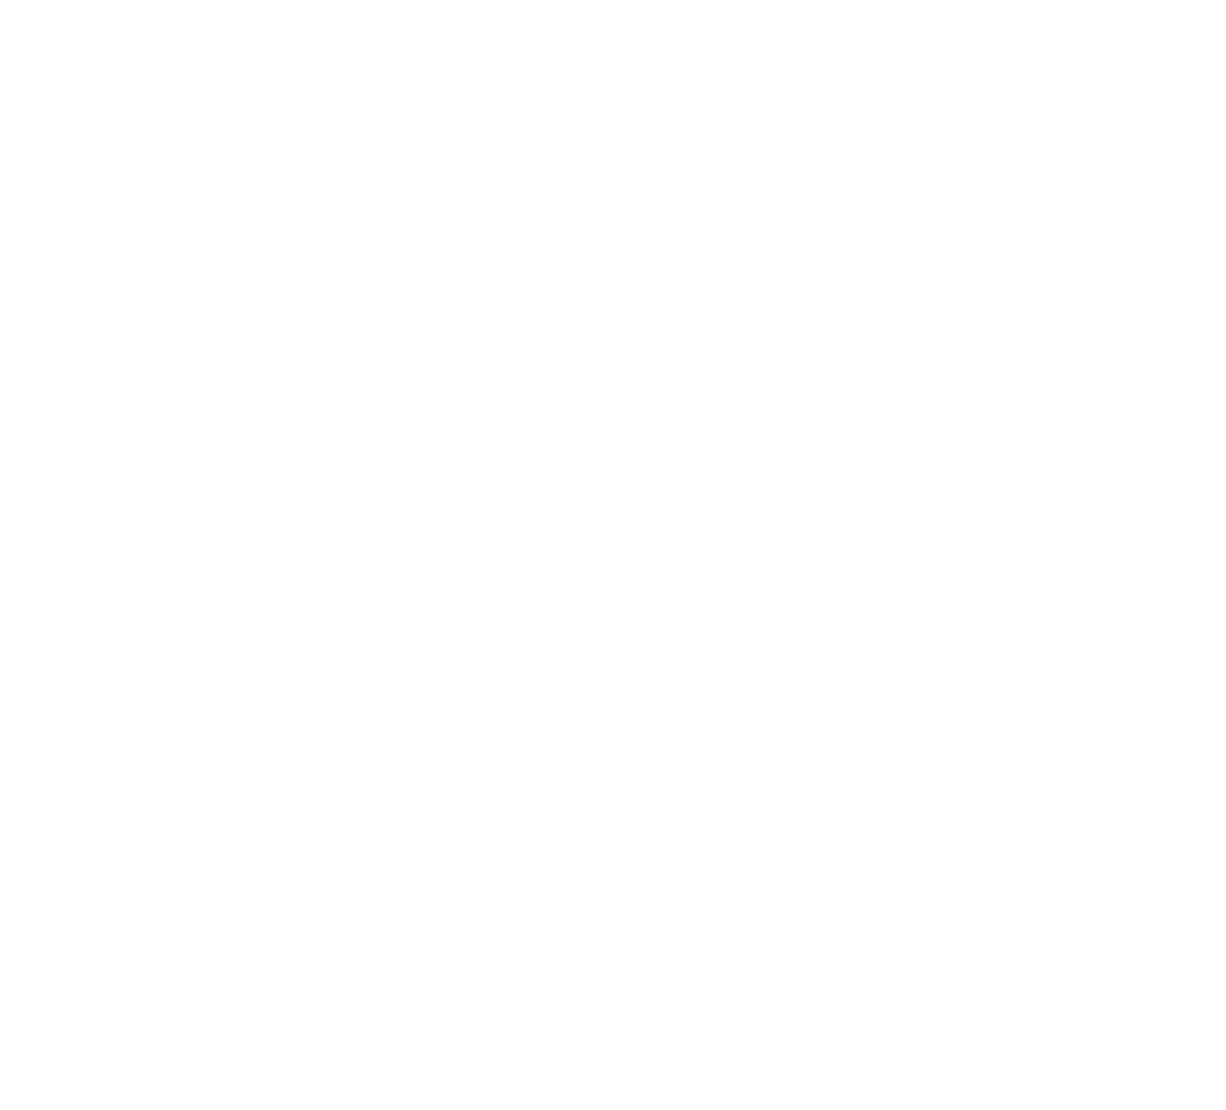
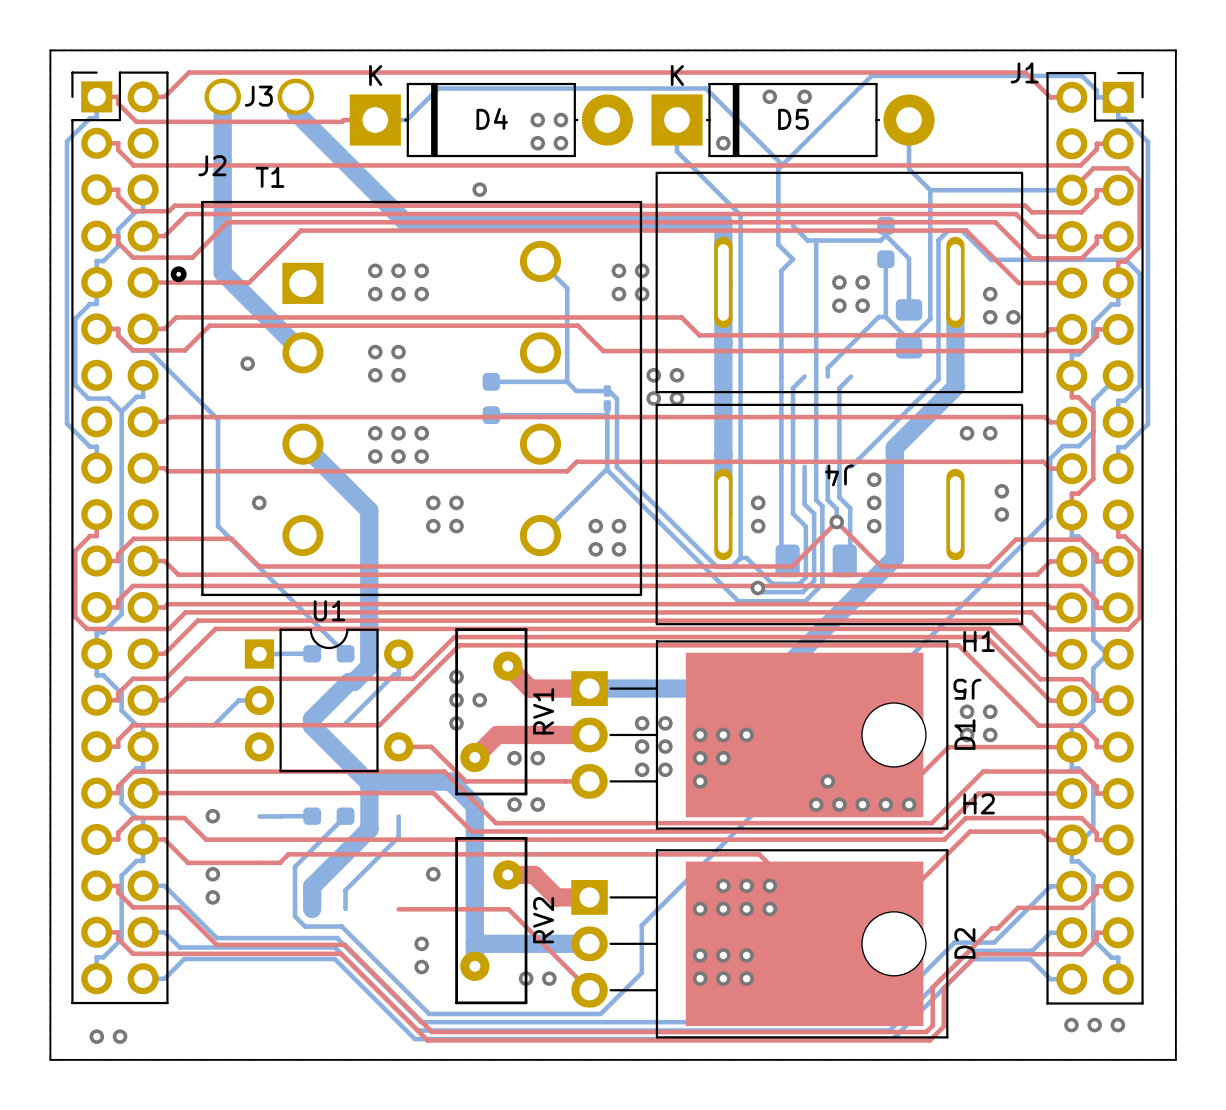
board edge: none -> (50, 50) (50, 1059) (1175, 1059) (1175, 50) (50, 50)
bottom track: none -> (96, 96) (96, 118) (90, 118) (67, 141) (67, 423) (90, 446) (96, 446) (96, 468)
top track: none -> (96, 96) (118, 96) (118, 103) (136, 121) (341, 121) (343, 120) (375, 120)
top track: none -> (143, 96) (164, 96) (188, 72) (1025, 72) (1050, 97) (1071, 97)
bottom track: none -> (222, 96) (222, 272) (302, 352)
J3: none -> (259, 96)
bottom track: none -> (295, 96) (295, 112) (405, 222) (723, 222) (723, 514)
via: none -> (769, 96)
via: none -> (804, 96)
bottom track: none -> (375, 120) (406, 120) (438, 88) (705, 88) (782, 164)
D4: none -> (491, 120)
via: none -> (537, 120)
via: none -> (560, 120)
bottom track: none -> (676, 120) (676, 151) (740, 215) (740, 558)
D5: none -> (792, 120)
bottom track: none -> (909, 120) (909, 168) (930, 190)
top track: none -> (96, 143) (118, 143) (118, 150) (133, 165) (1080, 165) (1096, 149) (1096, 143) (1118, 143)
via: none -> (537, 143)
via: none -> (560, 143)
via: none -> (723, 143)
top track: none -> (96, 189) (118, 189) (118, 196) (132, 211) (169, 211) (174, 205) (1025, 205) (1031, 212) (1081, 212) (1096, 196) (1096, 190) (1118, 190)
bottom track: none -> (143, 189) (143, 211) (136, 211) (118, 229) (118, 246) (103, 261) (96, 261) (96, 304) (90, 304) (75, 318) (75, 385) (88, 398) (108, 398) (121, 411)
via: none -> (479, 189)
bottom track: none -> (930, 190) (930, 318) (909, 340)
bottom track: none -> (930, 190) (1071, 190)
top track: none -> (1071, 190) (1093, 168) (1127, 168) (1139, 180) (1139, 246) (1124, 261) (1118, 261) (1118, 283)
bottom track: none -> (792, 225) (807, 240) (880, 240) (885, 235)
bottom track: none -> (885, 235) (909, 258) (909, 309)
top track: none -> (96, 236) (118, 236) (118, 242) (132, 257) (192, 257) (227, 222) (995, 222) (1031, 258) (1081, 258) (1096, 243) (1096, 236) (1118, 236)
top track: none -> (143, 236) (164, 236) (186, 214) (1016, 214) (1038, 236) (1071, 236)
bottom track: none -> (816, 240) (816, 500) (822, 506) (822, 584) (805, 601) (738, 601) (607, 470)
part: none -> (885, 242)
bottom track: none -> (885, 259) (885, 317)
bottom track: none -> (540, 261) (567, 288) (567, 381)
via: none -> (375, 270)
via: none -> (398, 270)
via: none -> (421, 270)
via: none -> (618, 270)
via: none -> (642, 270)
top track: none -> (143, 282) (249, 282) (301, 230) (966, 230) (1018, 283) (1071, 283)
J4: none -> (839, 282)
via: none -> (839, 282)
via: none -> (862, 282)
bottom track: none -> (955, 282) (955, 387) (894, 447) (894, 558) (764, 688) (589, 688)
bottom track: none -> (1118, 283) (1118, 304) (1111, 304) (1093, 322) (1093, 339) (1078, 354) (1071, 354) (1071, 375)
via: none -> (375, 294)
via: none -> (398, 294)
via: none -> (421, 294)
via: none -> (618, 294)
via: none -> (642, 294)
via: none -> (990, 294)
via: none -> (839, 305)
via: none -> (862, 305)
bottom track: none -> (885, 317) (878, 317) (827, 367) (827, 376)
bottom track: none -> (885, 317) (909, 340)
via: none -> (990, 317)
via: none -> (1013, 317)
bottom track: none -> (96, 328) (118, 328) (118, 335) (132, 350) (148, 350) (218, 419) (218, 526) (345, 653)
top track: none -> (96, 328) (118, 328) (118, 335) (132, 350) (184, 350) (209, 325) (577, 325) (603, 351) (1081, 351) (1096, 336) (1096, 329) (1118, 329)
top track: none -> (143, 328) (164, 328) (176, 317) (681, 317) (699, 335) (1044, 335) (1050, 329) (1071, 329)
part: none -> (909, 328)
via: none -> (375, 352)
via: none -> (398, 352)
via: none -> (247, 363)
bottom track: none -> (143, 375) (143, 396) (136, 396) (121, 411)
via: none -> (375, 375)
via: none -> (398, 375)
via: none -> (653, 375)
via: none -> (676, 375)
top track: none -> (1071, 375) (1071, 397) (1078, 397) (1093, 412) (1093, 478) (1078, 493) (1071, 493) (1071, 515)
bottom track: none -> (1118, 375) (1093, 400) (1093, 431) (1079, 446) (1062, 446) (1050, 458) (1050, 516) (641, 925) (641, 972) (600, 1013) (429, 1013) (341, 926) (305, 926) (295, 916) (295, 866) (345, 816)
bottom track: none -> (804, 376) (792, 388) (792, 513) (805, 526) (805, 577) (799, 583) (772, 583) (746, 558) (740, 558)
bottom track: none -> (851, 376) (839, 388) (839, 497) (850, 508) (850, 555) (844, 560)
bottom track: none -> (491, 381) (567, 381)
bottom track: none -> (567, 381) (576, 391) (609, 391) (616, 398) (616, 467) (716, 566) (731, 566) (740, 558)
T1: none -> (406, 398)
part: none -> (491, 398)
part: none -> (607, 398)
via: none -> (653, 398)
via: none -> (676, 398)
bottom track: none -> (607, 405) (607, 470)
bottom track: none -> (121, 411) (121, 614) (103, 632) (96, 632) (96, 675) (103, 675) (121, 693) (121, 710) (136, 725) (214, 725) (238, 700) (259, 700)
bottom track: none -> (491, 415) (607, 415)
top track: none -> (143, 421) (164, 421) (169, 417) (1045, 417) (1050, 422) (1071, 422)
bottom track: none -> (1118, 422) (1118, 400) (1124, 400) (1139, 385) (1139, 273) (1125, 259) (991, 259) (962, 230) (948, 230) (938, 240) (938, 379) (851, 466)
via: none -> (375, 433)
via: none -> (398, 433)
via: none -> (421, 433)
via: none -> (967, 433)
via: none -> (990, 433)
bottom track: none -> (302, 444) (369, 510) (369, 666) (354, 681) (349, 681) (312, 719) (312, 726) (367, 781) (450, 781) (474, 805) (474, 966)
via: none -> (375, 456)
via: none -> (398, 456)
via: none -> (421, 456)
bottom track: none -> (804, 466) (804, 504) (814, 513) (814, 580) (802, 592) (761, 592) (757, 587)
bottom track: none -> (827, 466) (827, 500) (836, 508) (836, 522)
top track: none -> (143, 468) (164, 468) (167, 471) (567, 471) (576, 461) (1043, 461) (1050, 468) (1071, 468)
bottom track: none -> (1118, 468) (1118, 447) (1124, 447) (1147, 424) (1147, 141) (1124, 118) (1118, 118) (1118, 97) (1096, 97) (1096, 90) (1082, 75) (871, 75) (778, 169) (778, 244) (792, 259) (781, 270) (781, 554) (787, 560)
bottom track: none -> (607, 470) (540, 535)
via: none -> (874, 479)
via: none -> (1001, 491)
via: none -> (259, 502)
via: none -> (433, 502)
via: none -> (456, 502)
via: none -> (758, 502)
via: none -> (874, 502)
top track: none -> (96, 514) (96, 536) (90, 536) (75, 550) (75, 617) (87, 628) (169, 628) (185, 612) (1031, 612) (1048, 629) (1128, 629) (1139, 617) (1139, 551) (1124, 536) (1118, 536) (1118, 515)
J5: none -> (839, 514)
via: none -> (1001, 514)
bottom track: none -> (1071, 515) (1071, 536) (1078, 536) (1093, 551) (1093, 640) (1107, 654)
via: none -> (836, 522)
via: none -> (433, 526)
via: none -> (456, 526)
via: none -> (595, 526)
via: none -> (618, 526)
via: none -> (758, 526)
via: none -> (874, 526)
J2: none -> (119, 537)
J1: none -> (1095, 538)
via: none -> (595, 549)
via: none -> (618, 549)
part: none -> (816, 560)
top track: none -> (96, 561) (118, 561) (118, 554) (133, 538) (231, 538) (259, 566) (792, 566) (836, 522) (881, 566) (989, 566) (1015, 539) (1081, 539) (1096, 554) (1096, 561) (1118, 561)
top track: none -> (143, 561) (164, 561) (178, 574) (1037, 574) (1050, 561) (1071, 561)
via: none -> (757, 587)
top track: none -> (96, 607) (118, 607) (118, 600) (132, 585) (1081, 585) (1096, 601) (1096, 607) (1118, 607)
top track: none -> (143, 607) (164, 607) (167, 604) (1046, 604) (1050, 607) (1071, 607)
top track: none -> (143, 653) (164, 653) (197, 620) (1016, 620) (1050, 654) (1071, 654)
bottom track: none -> (312, 653) (259, 654)
part: none -> (328, 653)
bottom track: none -> (398, 654) (398, 674) (394, 674) (345, 723)
bottom track: none -> (1107, 654) (1093, 668) (1093, 710) (1078, 725) (1071, 725) (1071, 768) (1078, 768) (1093, 783) (1093, 829) (1071, 850)
top track: none -> (507, 666) (530, 688) (589, 688)
via: none -> (456, 676)
top track: none -> (96, 700) (118, 700) (118, 693) (132, 678) (165, 678) (215, 628) (990, 628) (1040, 679) (1082, 679) (1096, 694) (1096, 700) (1118, 700)
top track: none -> (143, 700) (164, 700) (186, 678) (412, 678) (454, 637) (986, 637) (1050, 700) (1071, 700)
U1: none -> (329, 700)
via: none -> (456, 700)
via: none -> (479, 700)
RV1: none -> (491, 711)
via: none -> (967, 711)
via: none -> (990, 711)
via: none -> (456, 723)
via: none -> (642, 723)
via: none -> (665, 723)
bottom track: none -> (143, 725) (143, 768) (136, 768) (121, 782) (121, 803) (136, 818) (143, 818) (143, 860) (136, 860) (121, 875) (121, 939) (103, 957) (96, 957) (96, 978)
top track: none -> (589, 734) (497, 734) (474, 757)
via: none -> (700, 734)
via: none -> (723, 734)
via: none -> (746, 734)
D1: none -> (759, 734)
top track: none -> (804, 734) (842, 773) (922, 773) (948, 747) (1071, 747)
H1: none -> (804, 734)
via: none -> (967, 734)
via: none -> (990, 734)
top track: none -> (96, 746) (118, 746) (118, 739) (132, 725) (379, 725) (459, 645) (958, 645) (1038, 725) (1082, 725) (1096, 740) (1096, 747) (1118, 747)
top track: none -> (398, 746) (431, 746) (465, 781) (589, 781)
via: none -> (642, 746)
via: none -> (665, 746)
via: none -> (514, 758)
via: none -> (537, 758)
via: none -> (700, 758)
via: none -> (723, 758)
via: none -> (642, 769)
via: none -> (665, 769)
bottom track: none -> (369, 781) (369, 829) (312, 886) (312, 909)
via: none -> (700, 781)
via: none -> (827, 781)
top track: none -> (96, 793) (118, 793) (118, 786) (132, 771) (444, 771) (496, 823) (931, 823) (983, 771) (1081, 771) (1096, 786) (1096, 793) (1118, 793)
top track: none -> (143, 793) (433, 793) (471, 831) (940, 831) (978, 793) (1071, 793)
via: none -> (514, 804)
via: none -> (537, 804)
via: none -> (816, 804)
via: none -> (839, 804)
via: none -> (862, 804)
via: none -> (885, 804)
via: none -> (909, 804)
via: none -> (212, 816)
bottom track: none -> (312, 816) (259, 816)
part: none -> (328, 816)
bottom track: none -> (398, 816) (398, 837) (345, 890) (345, 909)
top track: none -> (96, 839) (118, 839) (118, 832) (132, 818) (184, 818) (206, 839) (944, 839) (965, 818) (1081, 818) (1096, 833) (1096, 839) (1118, 839)
top track: none -> (143, 839) (164, 839) (187, 862) (280, 862) (288, 854) (759, 854) (804, 899)
bottom track: none -> (1071, 839) (1071, 861) (1078, 861) (1093, 876) (1093, 939) (1111, 957) (1118, 957) (1118, 979)
top track: none -> (1071, 839) (1050, 839) (1042, 831) (969, 831) (901, 899) (804, 899)
via: none -> (212, 874)
via: none -> (433, 874)
top track: none -> (507, 874) (534, 874) (556, 897) (589, 897)
top track: none -> (96, 885) (118, 885) (118, 892) (132, 907) (179, 907) (216, 944) (344, 944) (431, 1032) (926, 1032) (932, 1025) (932, 987) (991, 928) (997, 928) (1018, 907) (1082, 907) (1096, 893) (1096, 886) (1118, 886)
bottom track: none -> (143, 885) (164, 885) (216, 938) (337, 938) (421, 1022) (874, 1022) (954, 942) (994, 942) (1050, 886) (1071, 886)
via: none -> (723, 885)
via: none -> (746, 885)
via: none -> (769, 885)
via: none -> (212, 897)
top track: none -> (398, 909) (508, 909) (589, 990)
via: none -> (700, 909)
via: none -> (723, 909)
via: none -> (746, 909)
via: none -> (769, 909)
RV2: none -> (491, 920)
top track: none -> (96, 932) (118, 932) (118, 939) (132, 953) (340, 953) (427, 1040) (929, 1040) (943, 1026) (943, 987) (977, 954) (1082, 954) (1096, 939) (1096, 932) (1118, 932)
bottom track: none -> (143, 932) (164, 932) (179, 947) (334, 947) (417, 1030) (889, 1030) (969, 950) (1032, 950) (1050, 932) (1071, 932)
via: none -> (421, 943)
bottom track: none -> (474, 943) (589, 943)
D2: none -> (759, 943)
H2: none -> (804, 943)
via: none -> (700, 955)
via: none -> (723, 955)
via: none -> (746, 955)
via: none -> (421, 967)
bottom track: none -> (143, 978) (164, 978) (184, 959) (334, 959) (414, 1039) (892, 1039) (972, 959) (1030, 959) (1050, 979) (1071, 979)
via: none -> (526, 978)
via: none -> (549, 978)
via: none -> (700, 978)
via: none -> (723, 978)
via: none -> (746, 978)
via: none -> (1071, 1025)
via: none -> (1094, 1025)
via: none -> (1117, 1025)
via: none -> (96, 1036)
via: none -> (120, 1036)

